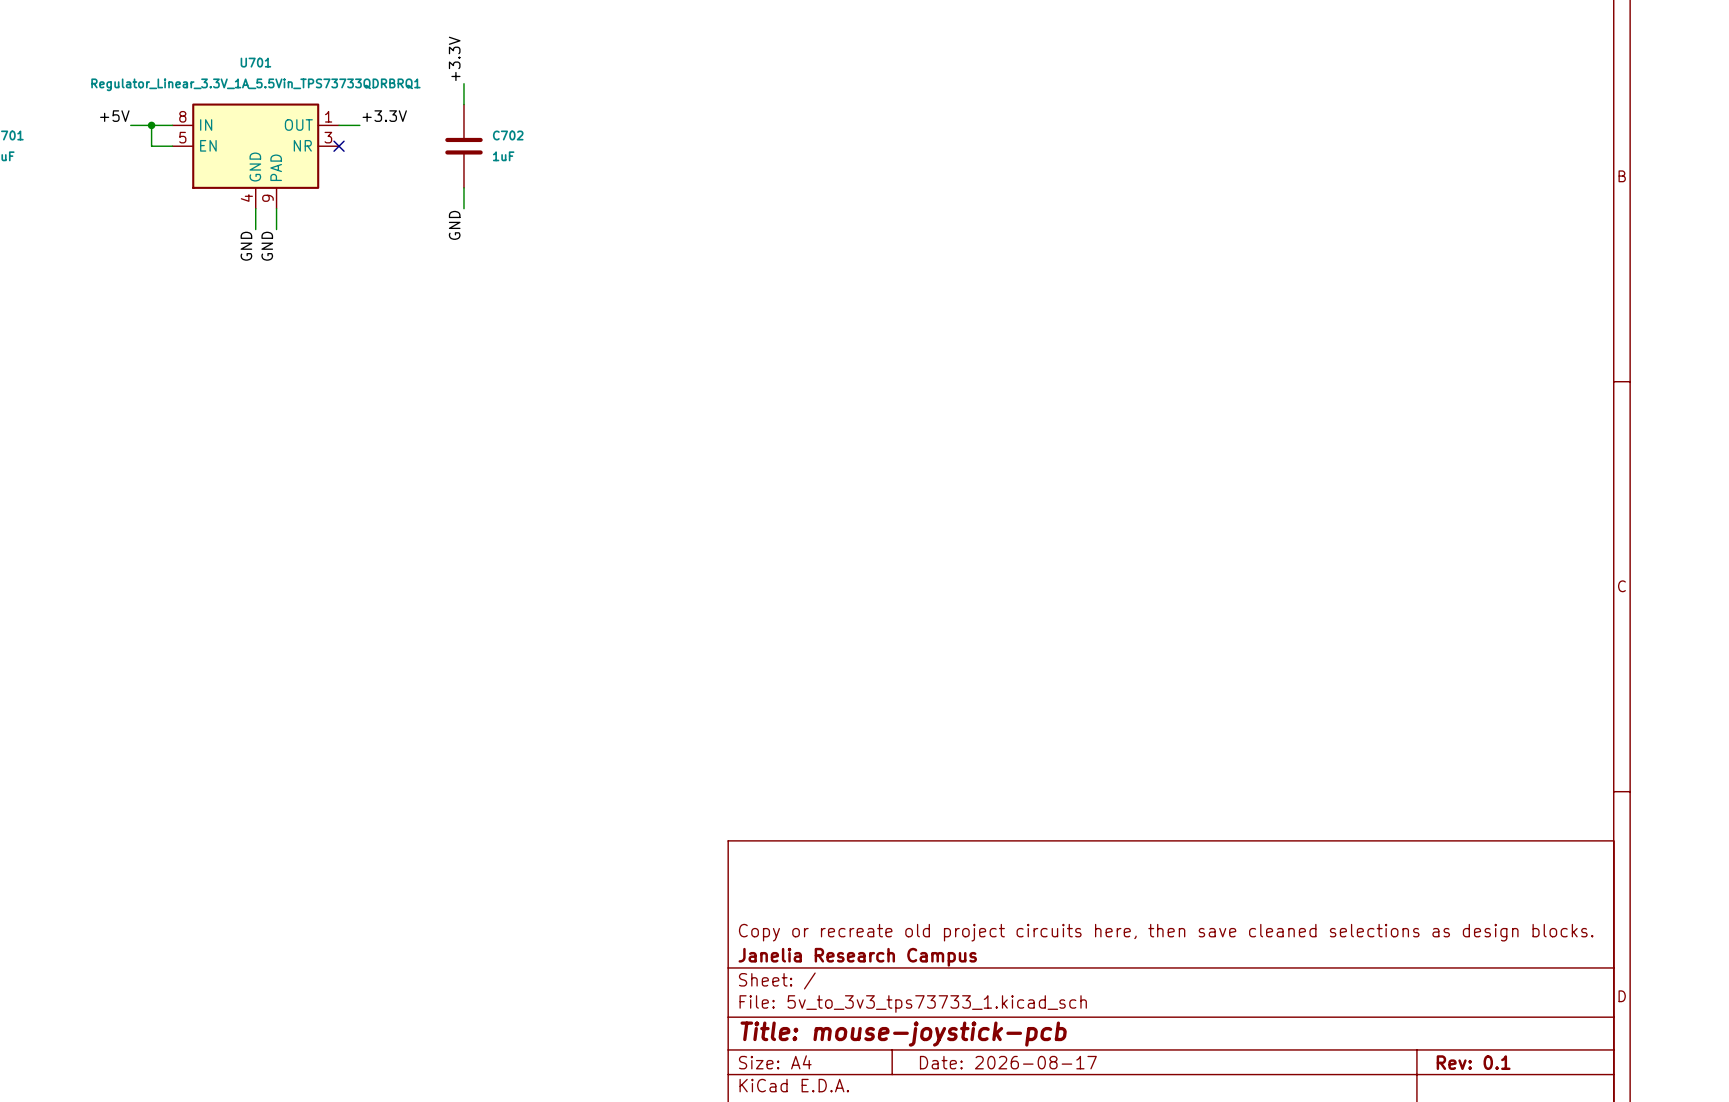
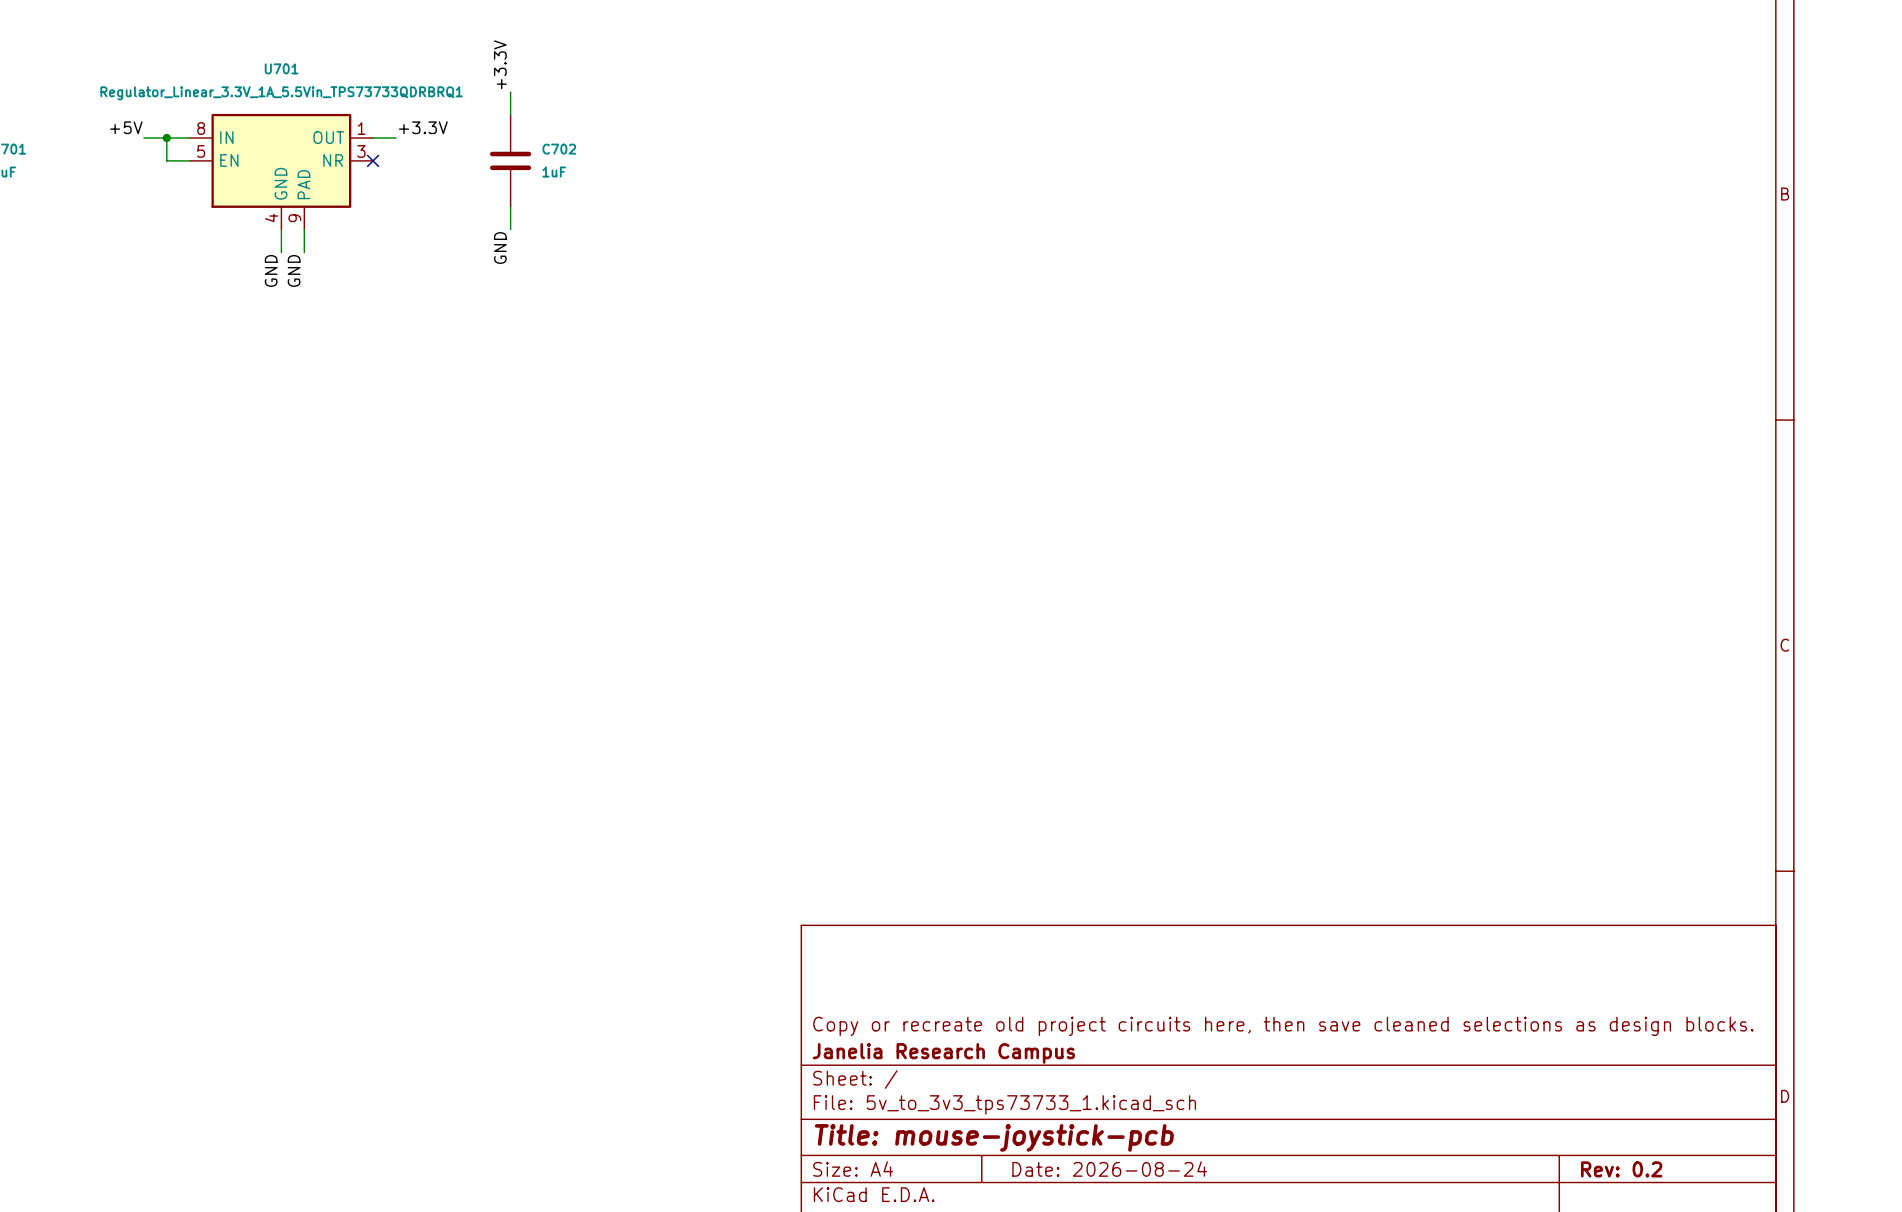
title block: Date: 2026-08-17 (1008, 1062) -> Date: 2026-08-24 (1109, 1169)
title block: Rev: 0.1 (1473, 1062) -> Rev: 0.2 (1621, 1169)

